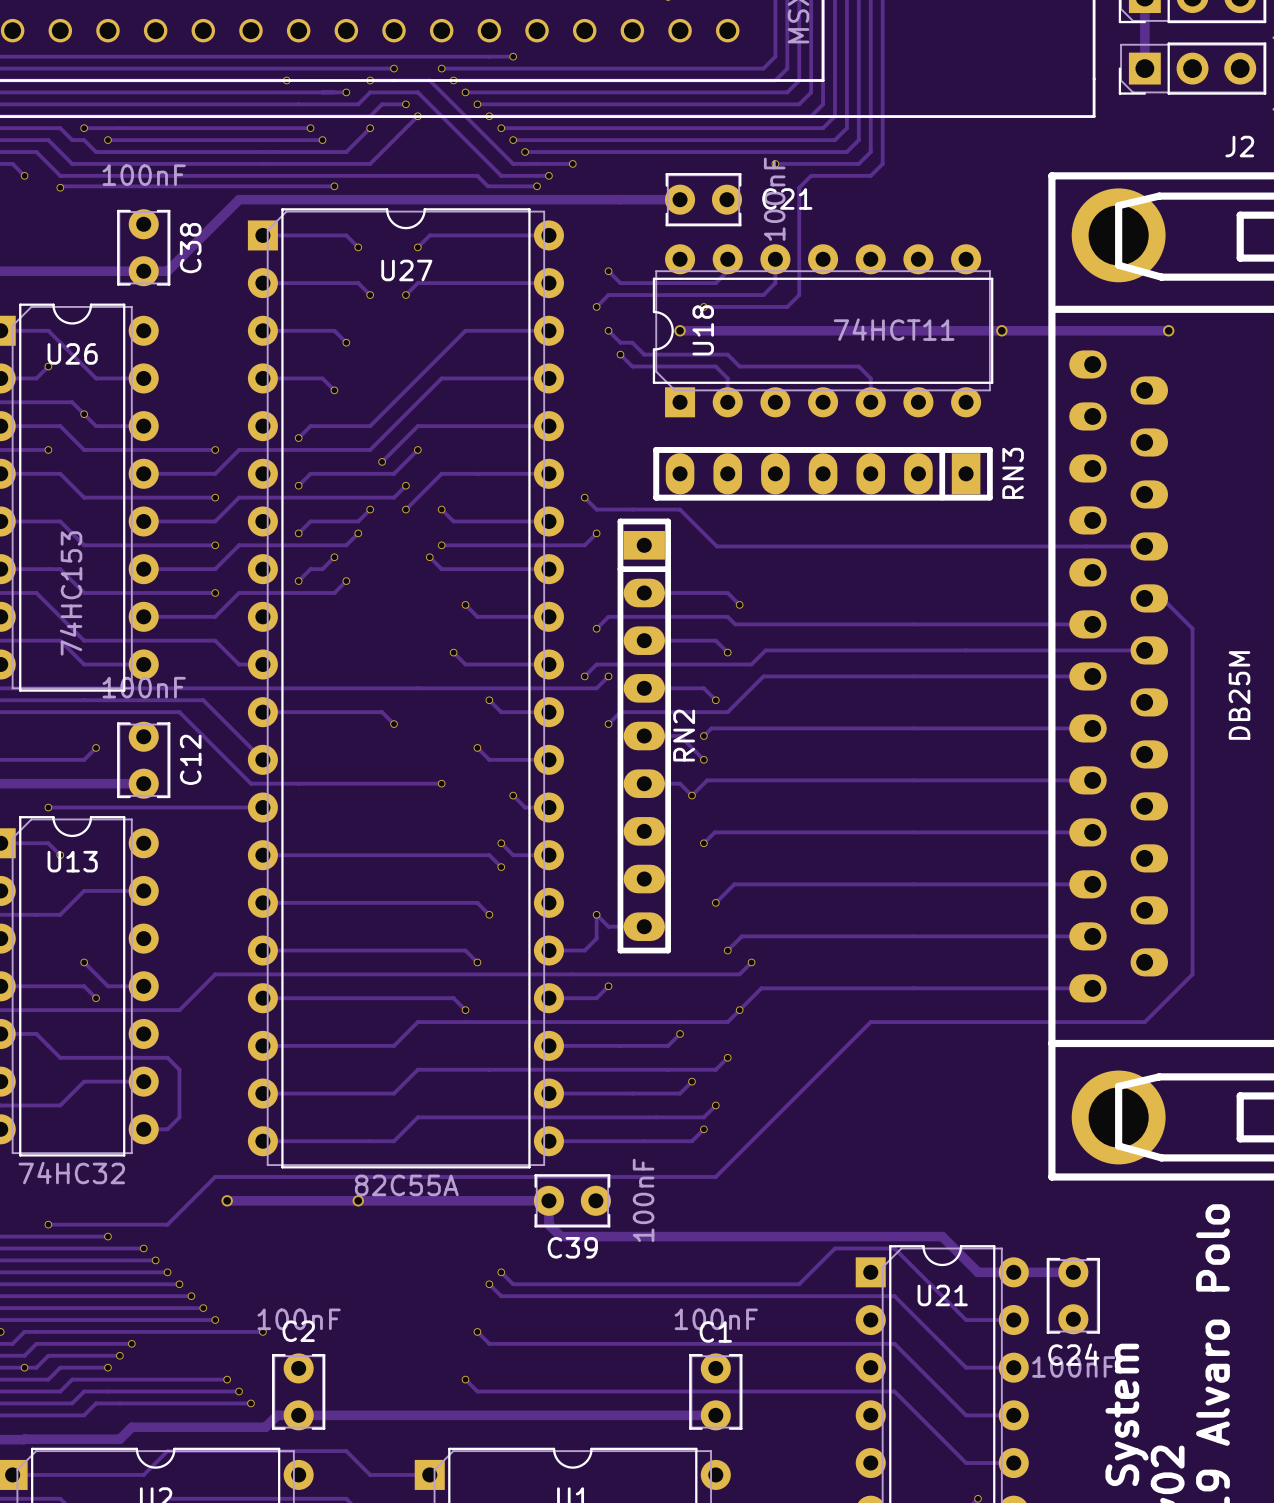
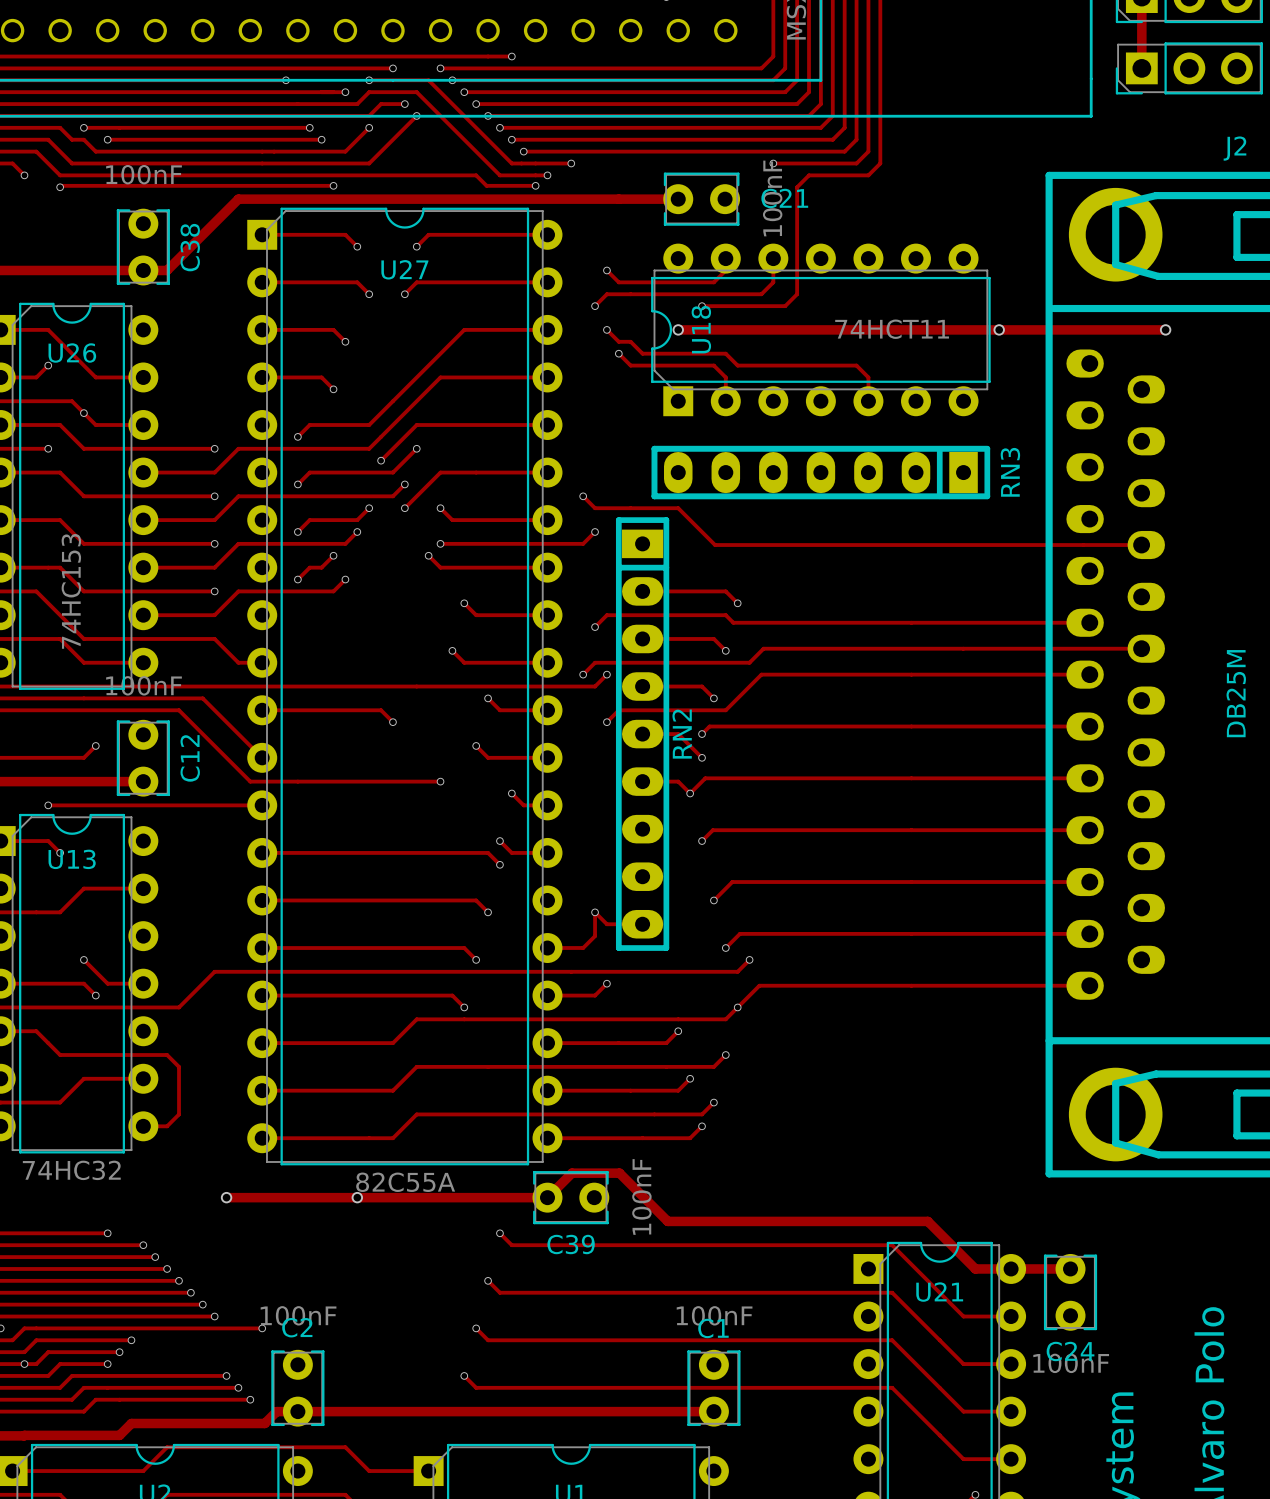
track: (1144, 598) (1162, 598) (1192, 628) (1192, 974) (1144, 1022) (870, 1022) (715, 1176) (215, 1176) (167, 1224) (48, 1224) -> none
track: (548, 1200) (548, 1224) (560, 1236) (942, 1236) -> (547, 1197) (571, 1173) (619, 1173) (667, 1221) (927, 1221) (939, 1233)
via: (48, 1224) -> none
track: (834, 1248) (799, 1284) (513, 1284) (501, 1272) -> (832, 1245) (511, 1245) (499, 1233)
via position: (501, 1272) -> (499, 1233)

